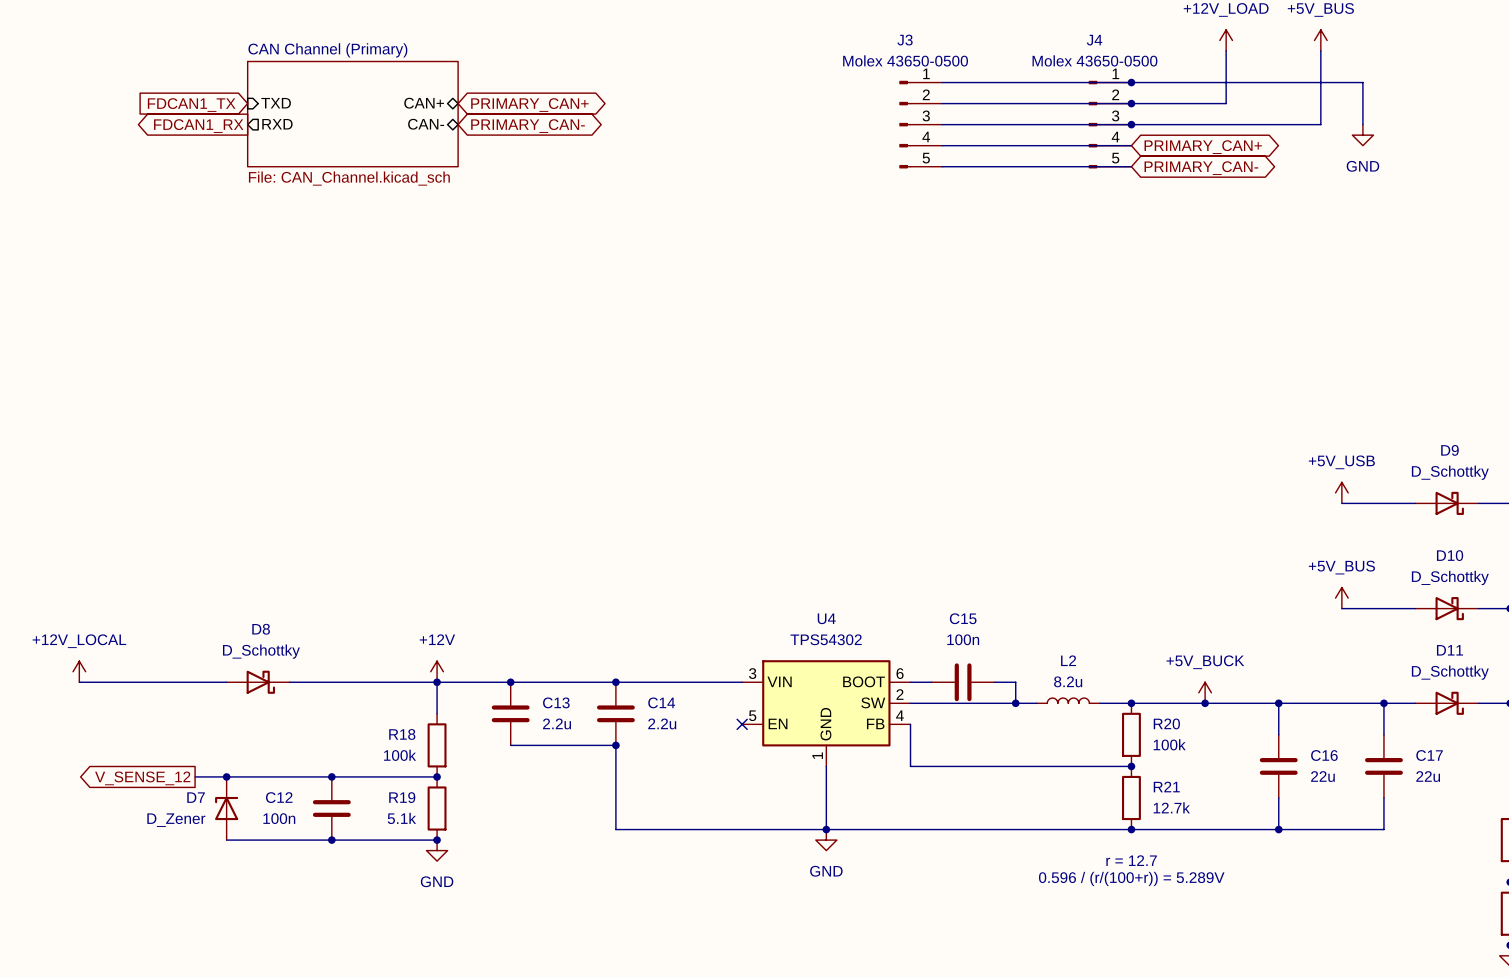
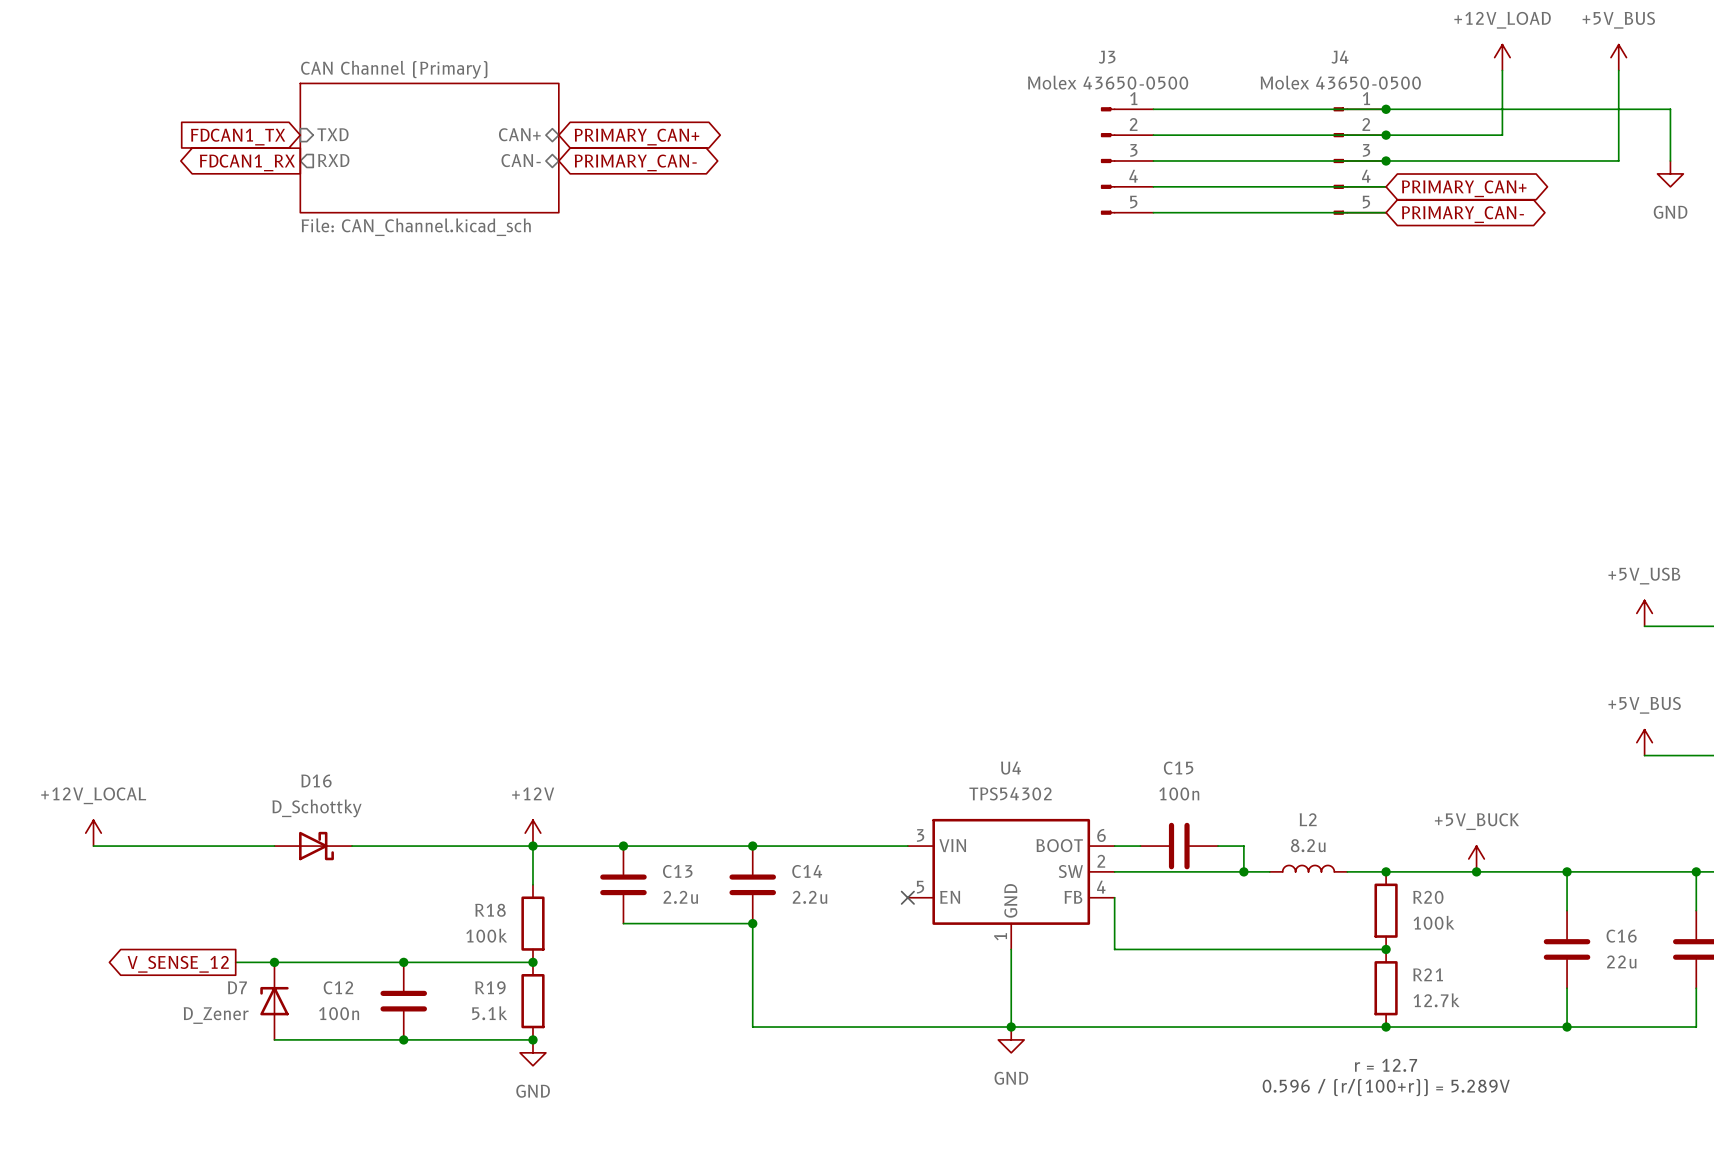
D8 name: D8 (261, 629) -> D16 (316, 781)

